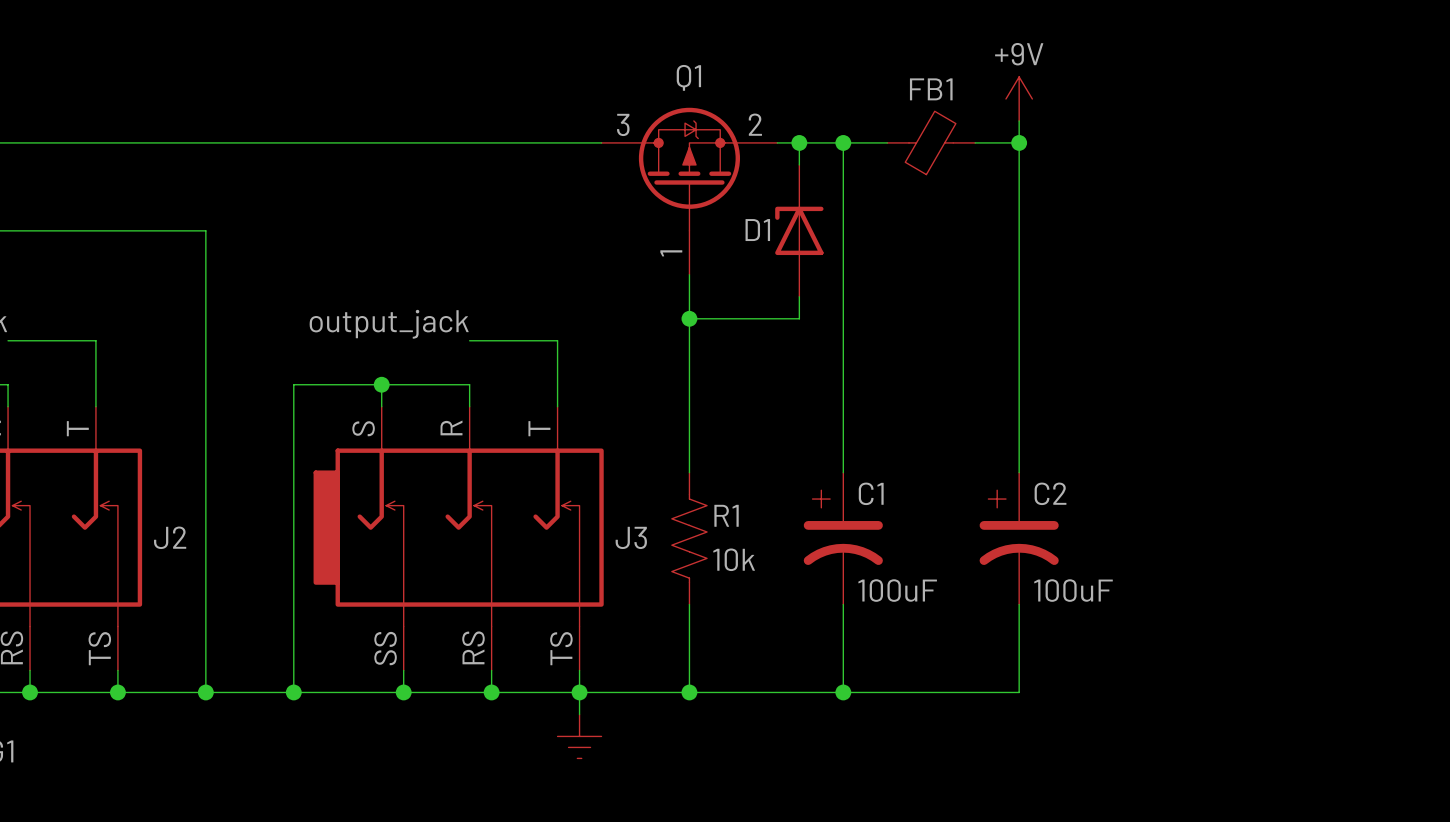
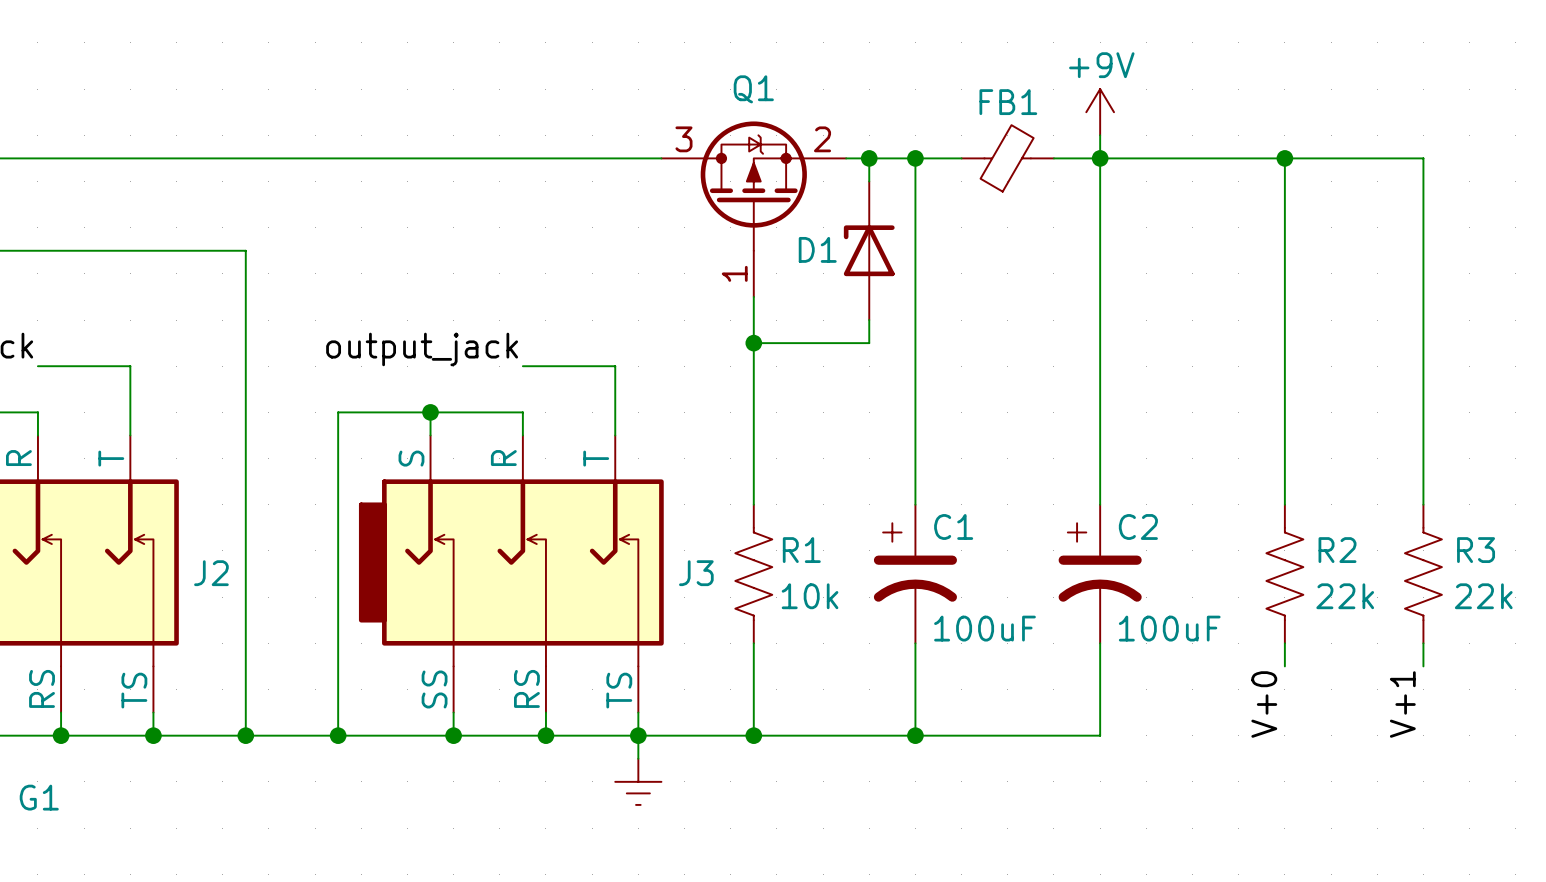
wire: none -> (1100, 158) (1423, 158) (1423, 504)
wire: none -> (1284, 158) (1284, 504)
junction: none -> (1284, 158)
R2: none -> 22k (1284, 574)
R3: none -> 22k (1423, 574)
wire: none -> (1284, 643) (1284, 666)
wire: none -> (1423, 643) (1423, 666)
label: none -> V+1 (1402, 704)
label: none -> V+0 (1264, 704)

